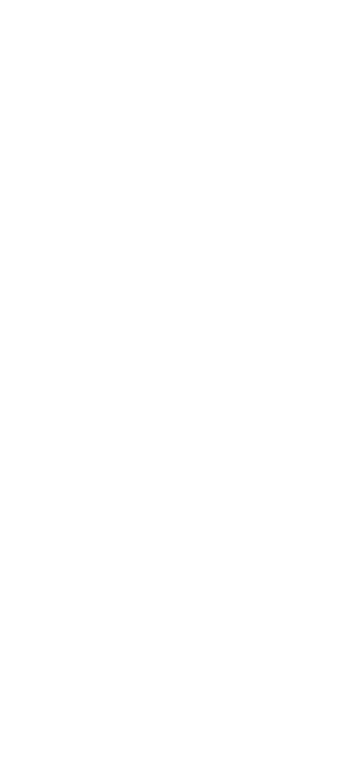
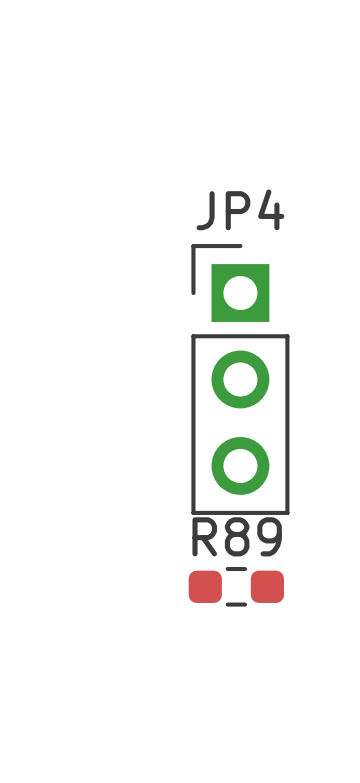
JP4: none -> (240, 379)
R89: none -> (236, 586)

